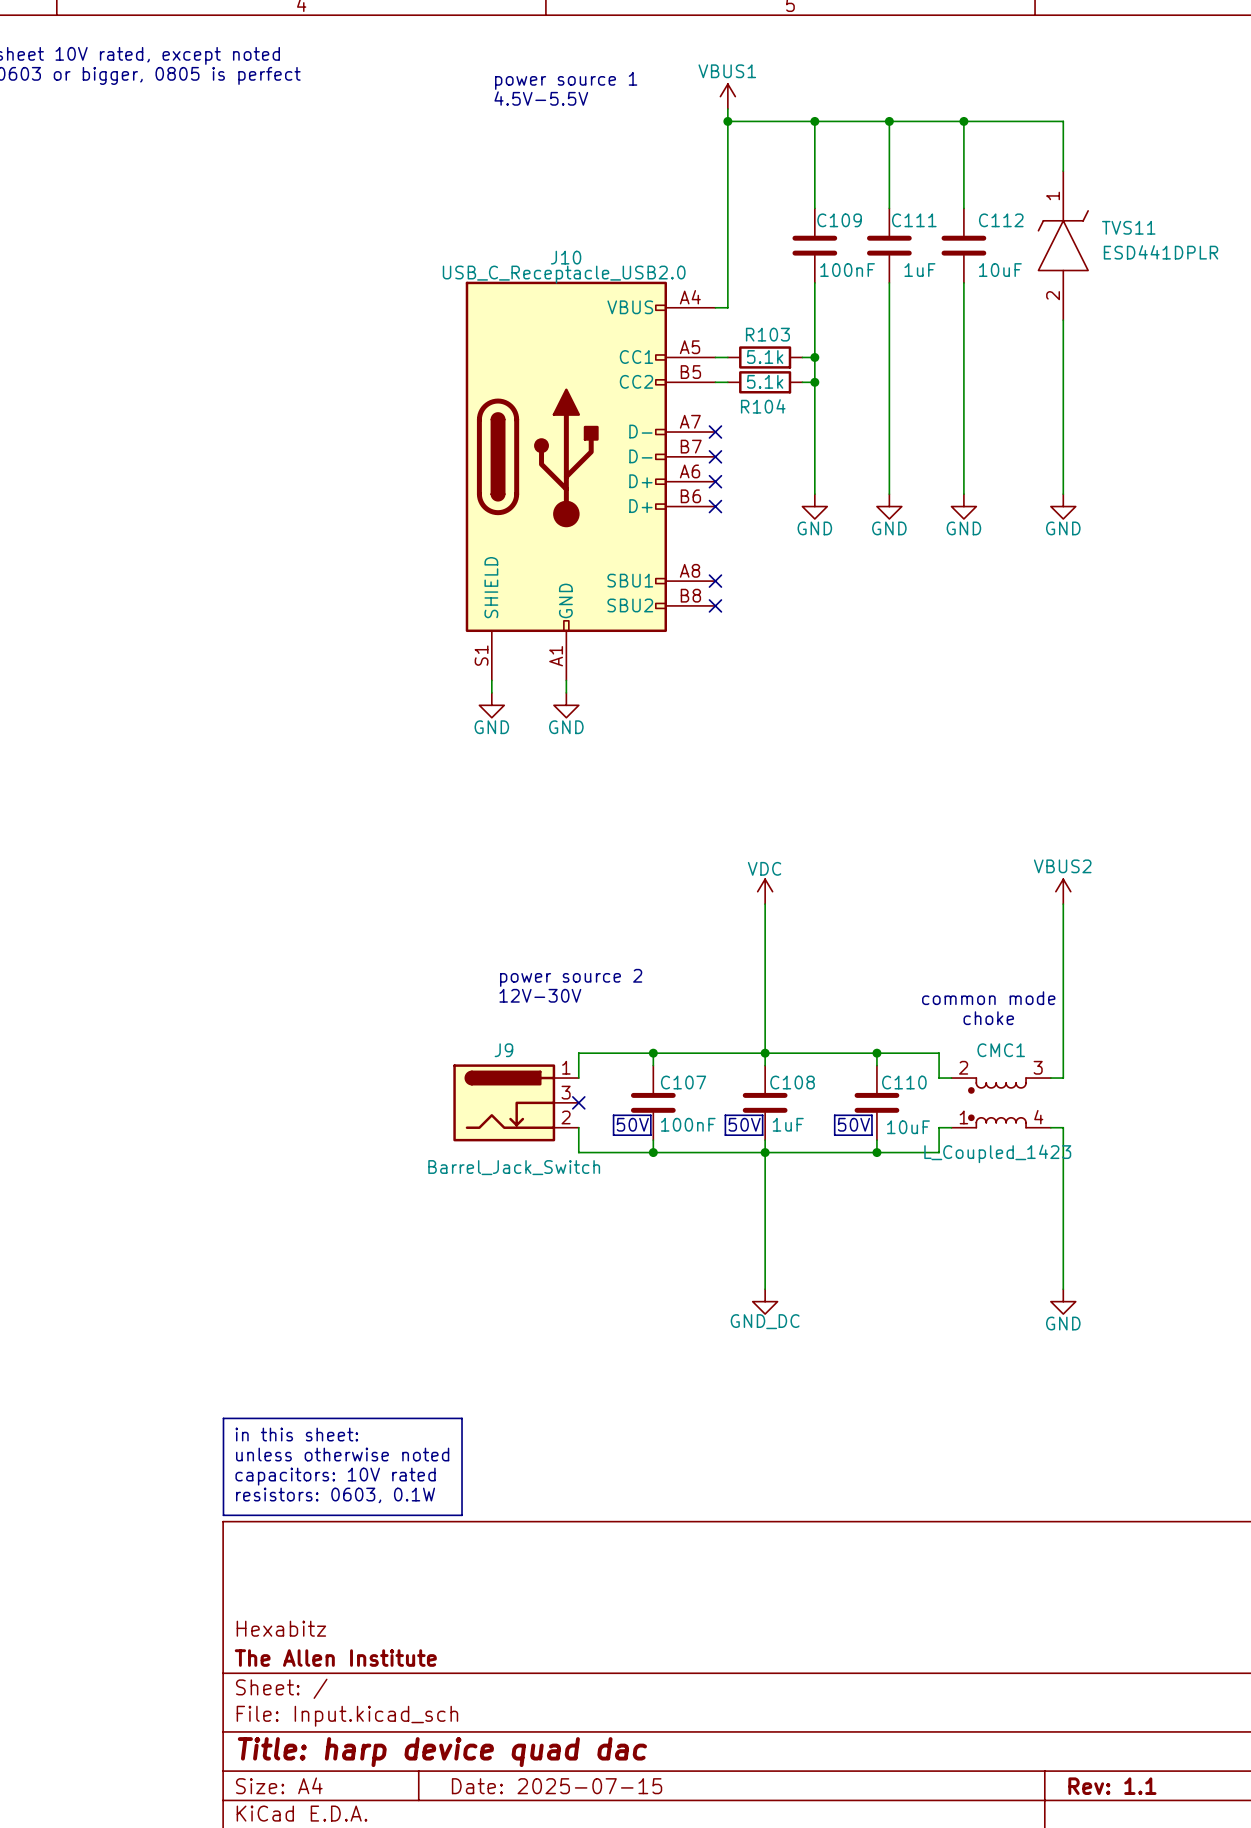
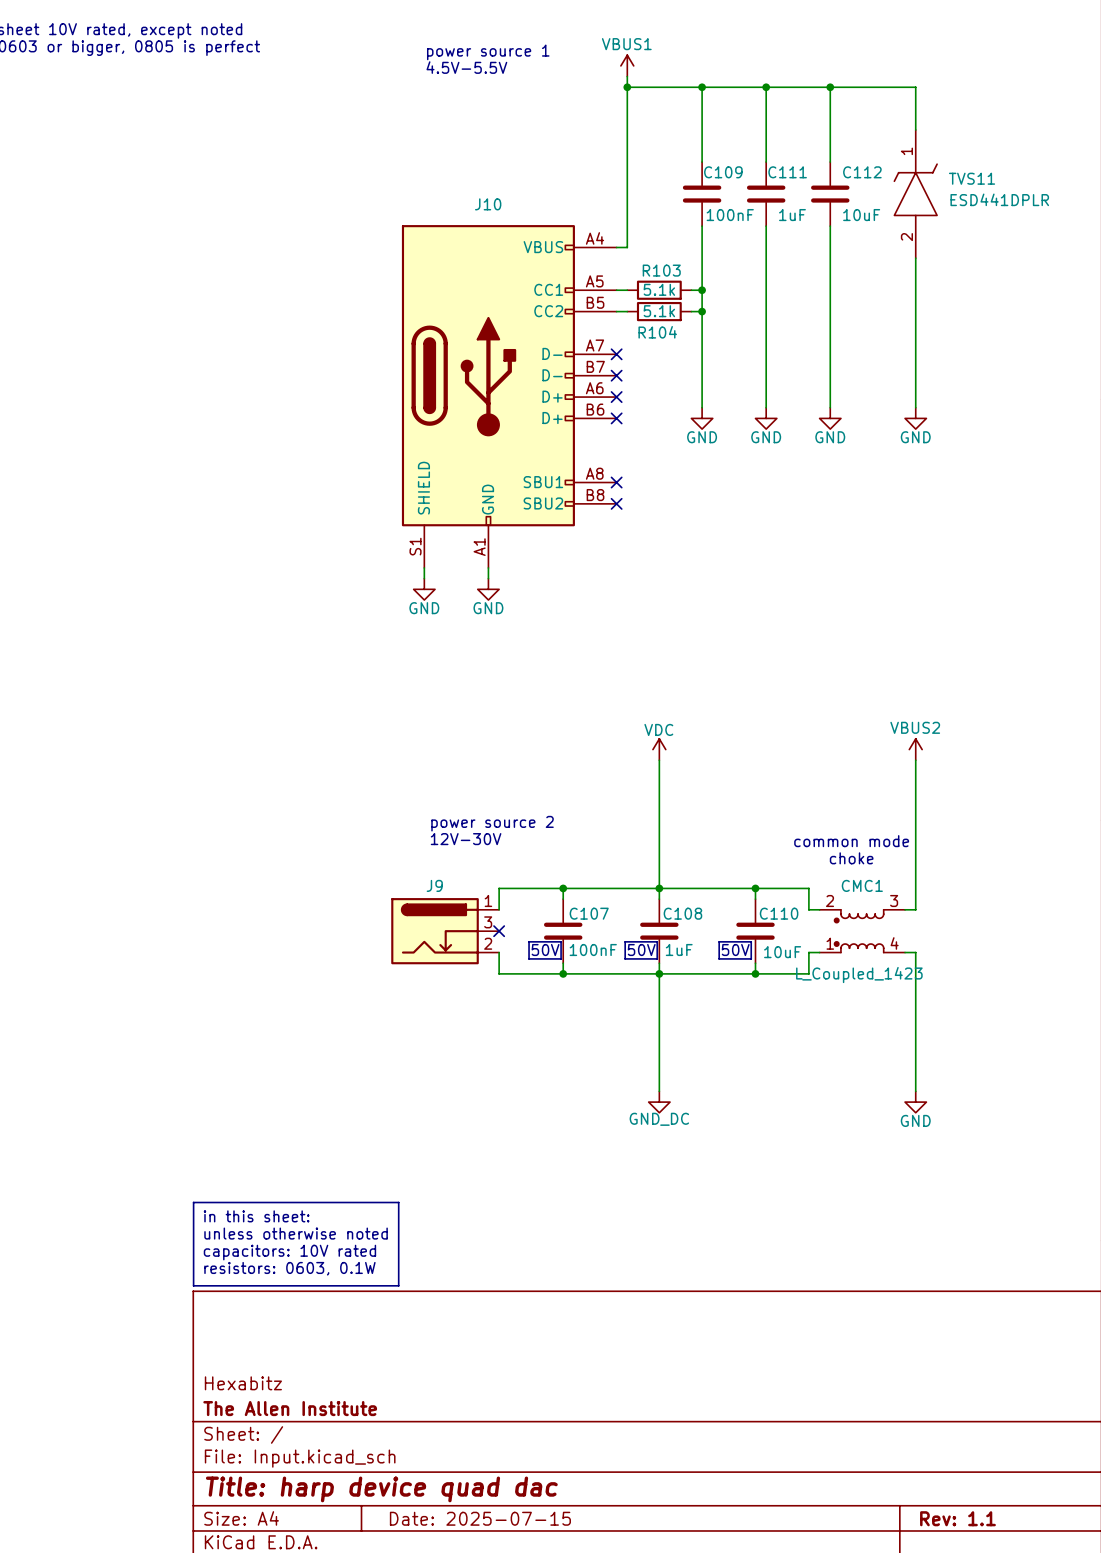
J10 value: USB_C_Receptacle_USB2.0 (564, 274) -> none
J9 value: Barrel_Jack_Switch (514, 1167) -> none

